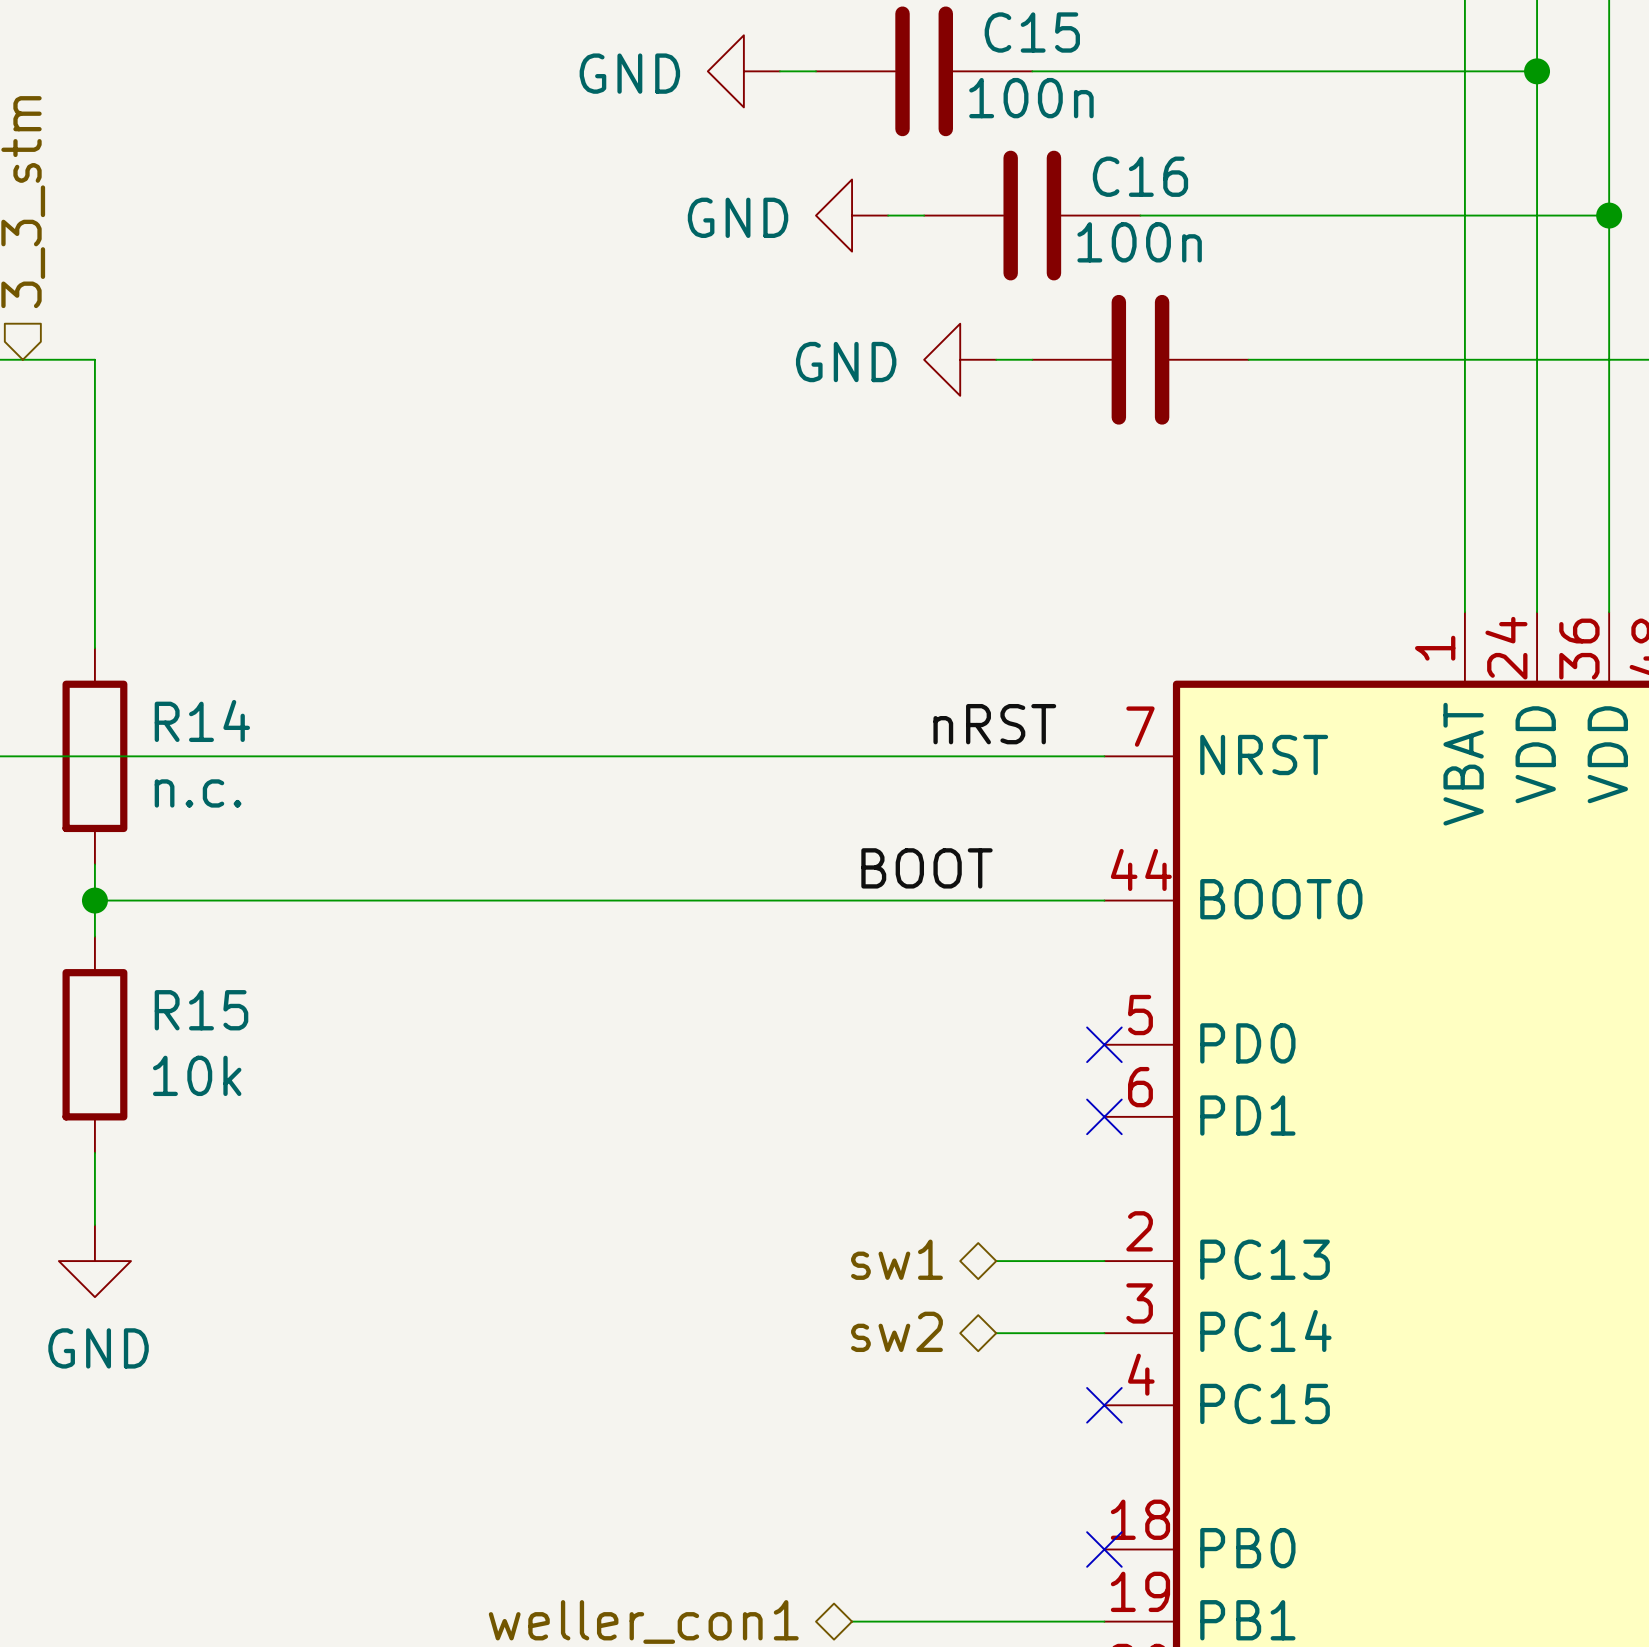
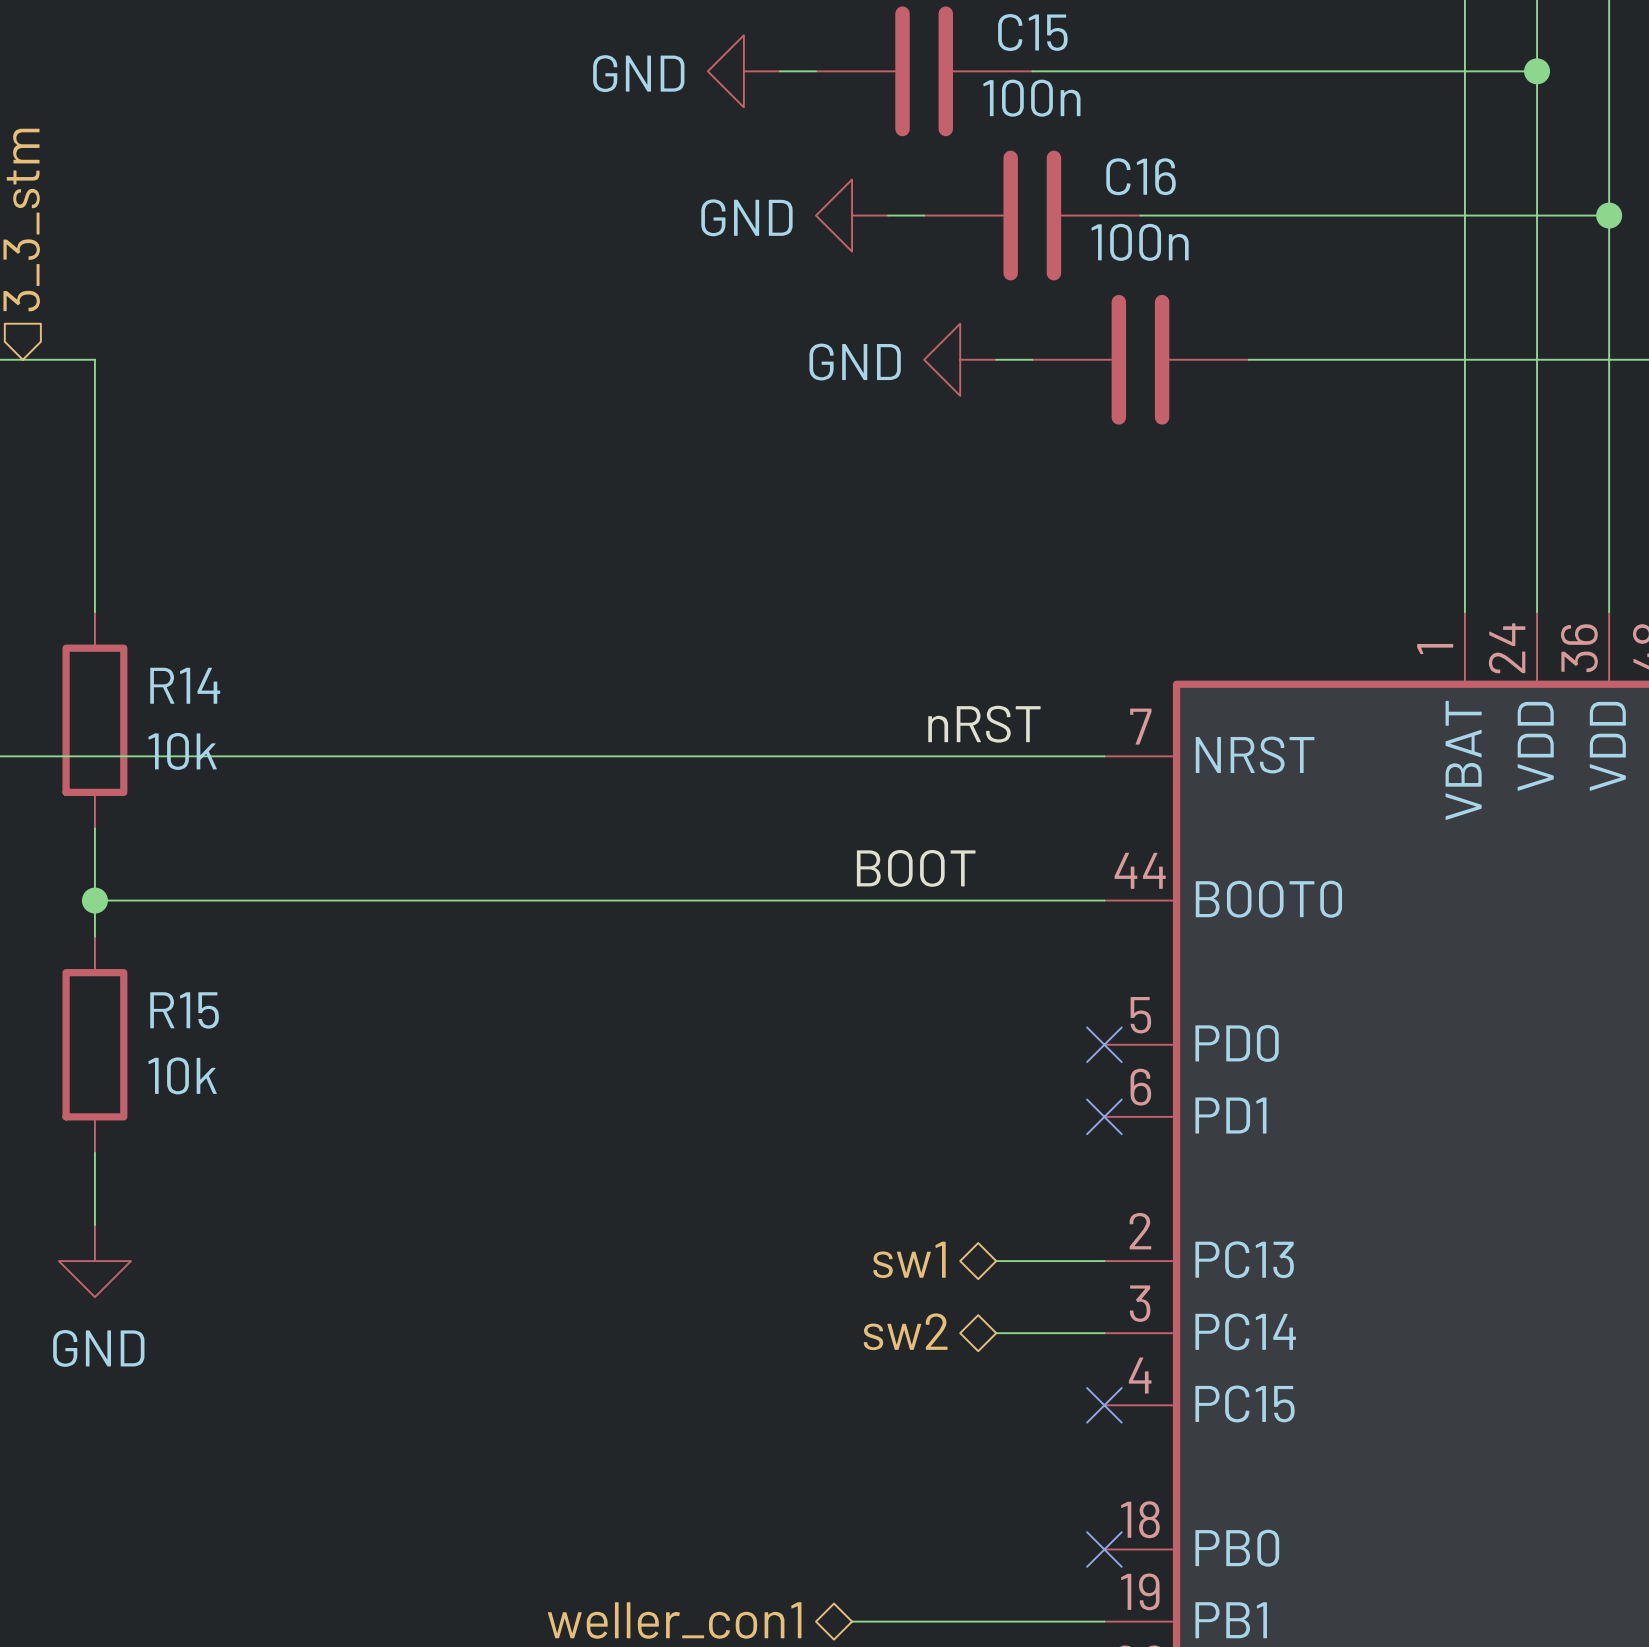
R14 position: (94, 756) -> (94, 720)
R14 value: n.c. (198, 793) -> 10k (182, 751)

